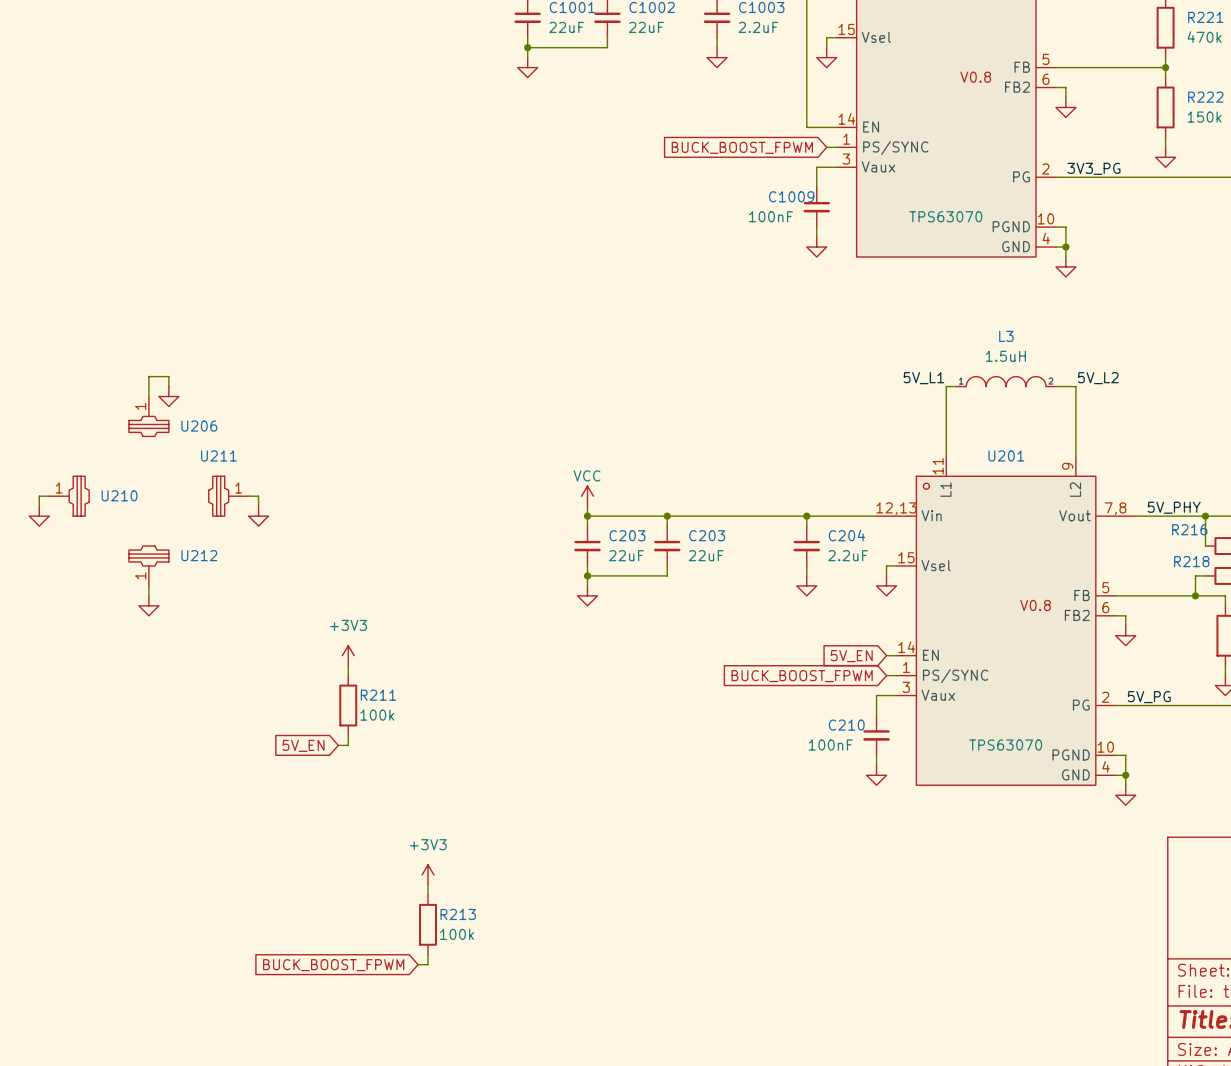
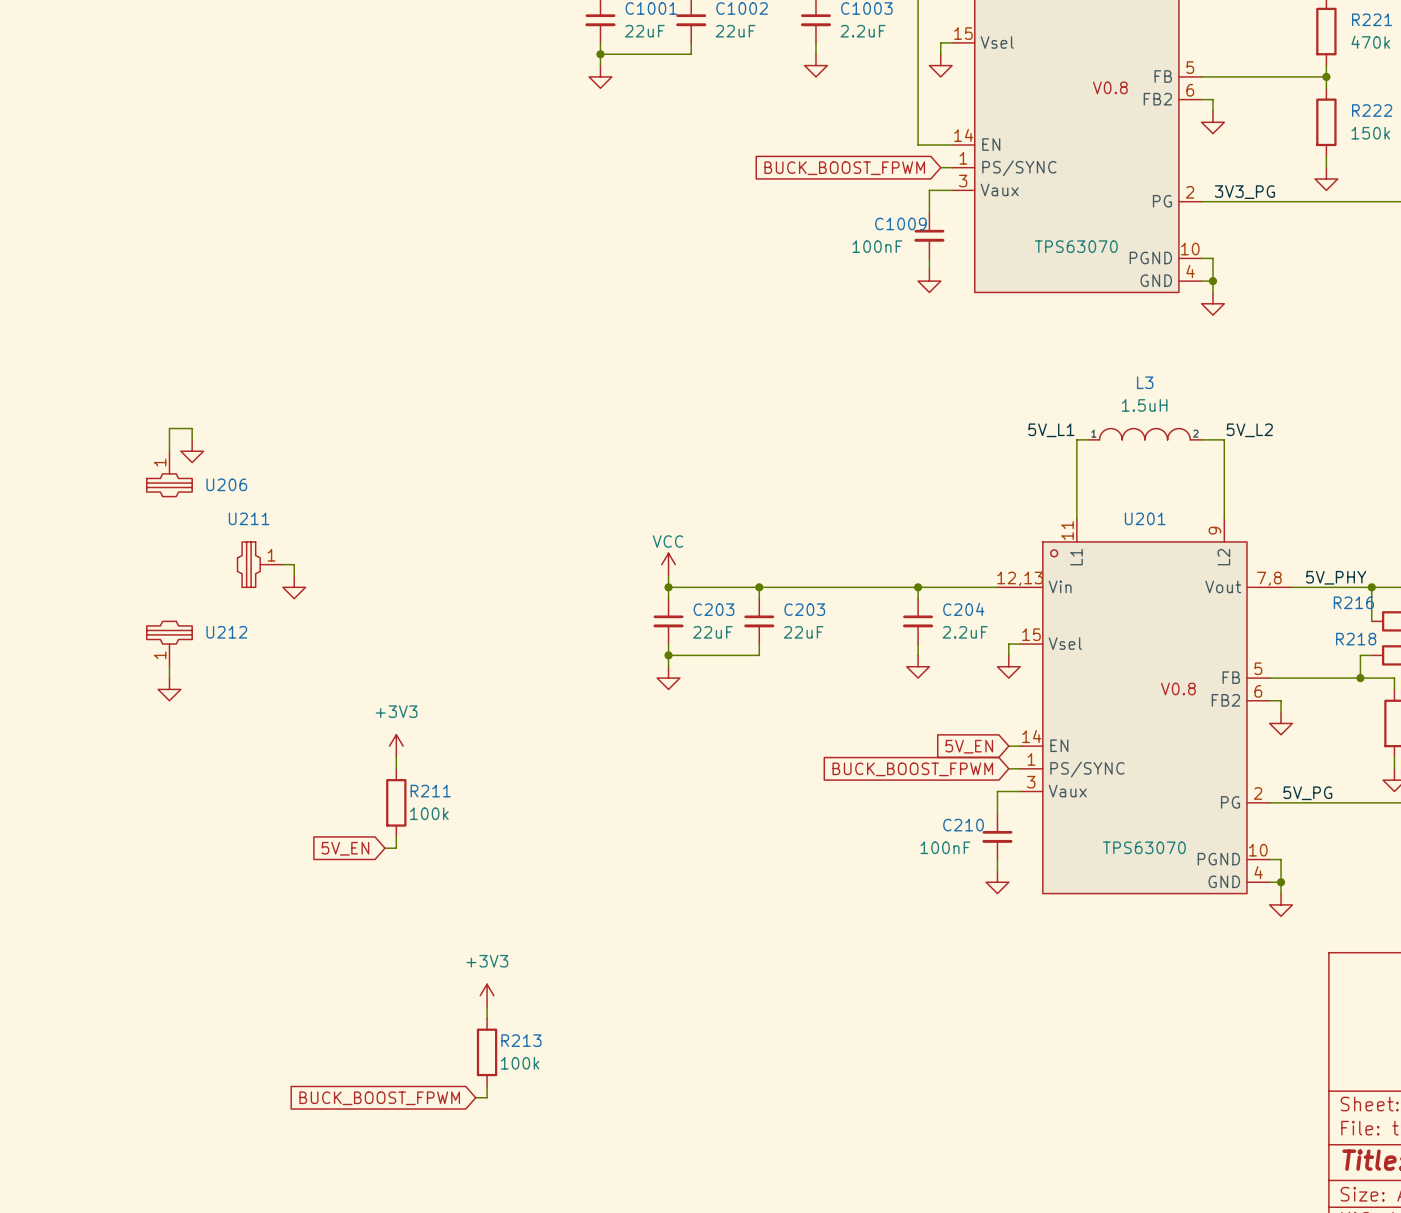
wire: (49, 496) (39, 496) (39, 506) -> none
U210: (69, 496) -> none
power symbol: (39, 516) -> none

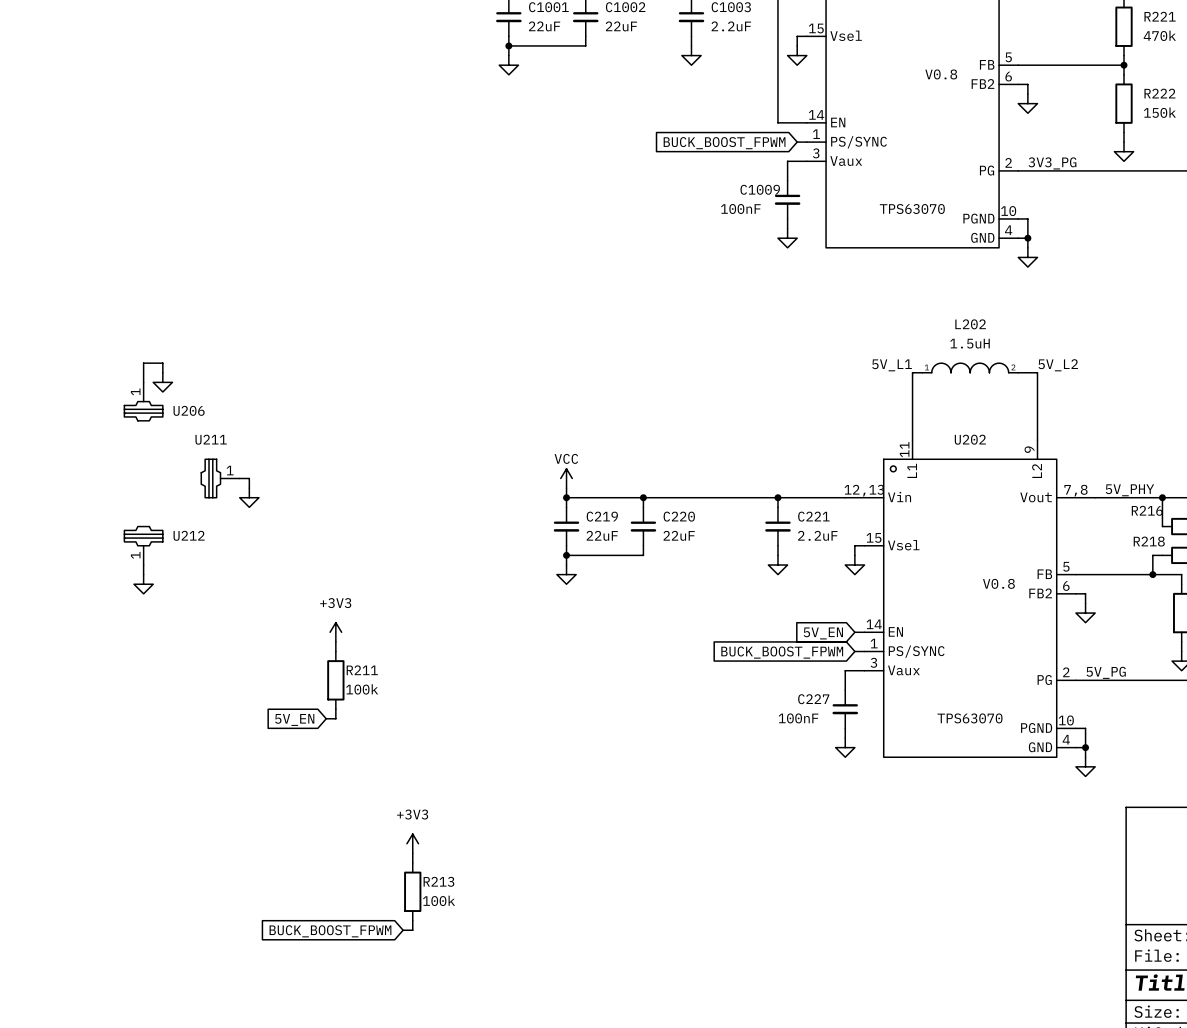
L3 name: L3 (1145, 382) -> L202 (970, 324)
U201 name: U201 (1145, 518) -> U202 (970, 439)
C203 name: C203 (713, 609) -> C219 (602, 516)
C203 name: C203 (804, 609) -> C220 (679, 516)
C204 name: C204 (963, 609) -> C221 (813, 516)
C210 name: C210 (963, 825) -> C227 (813, 699)

